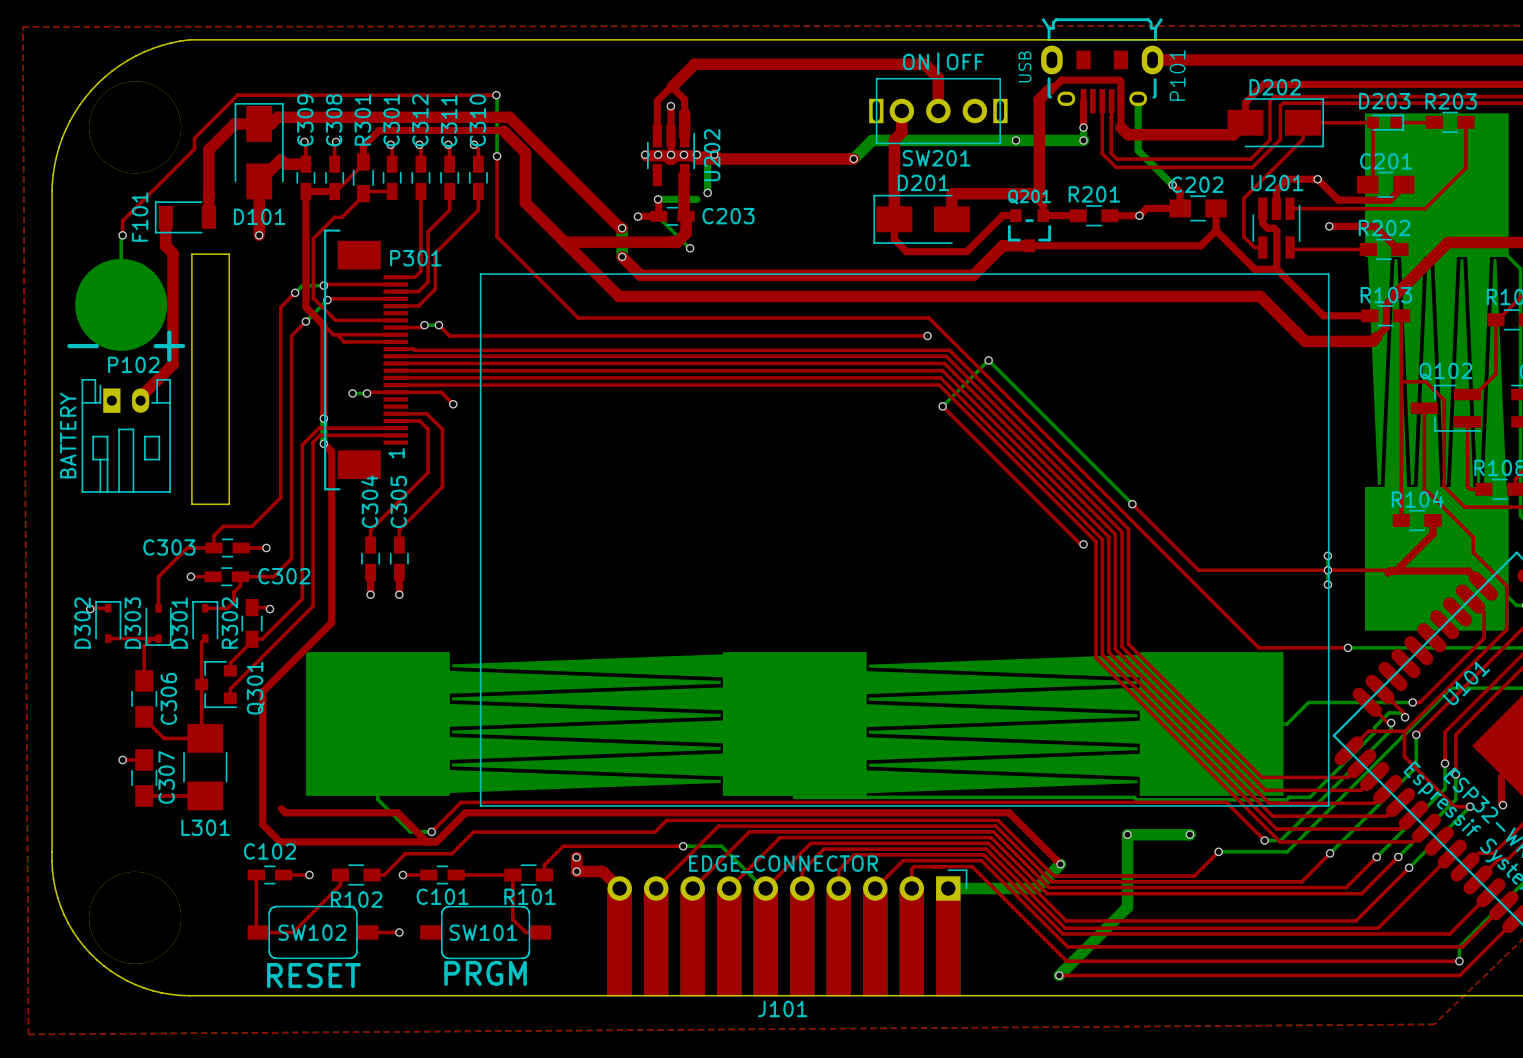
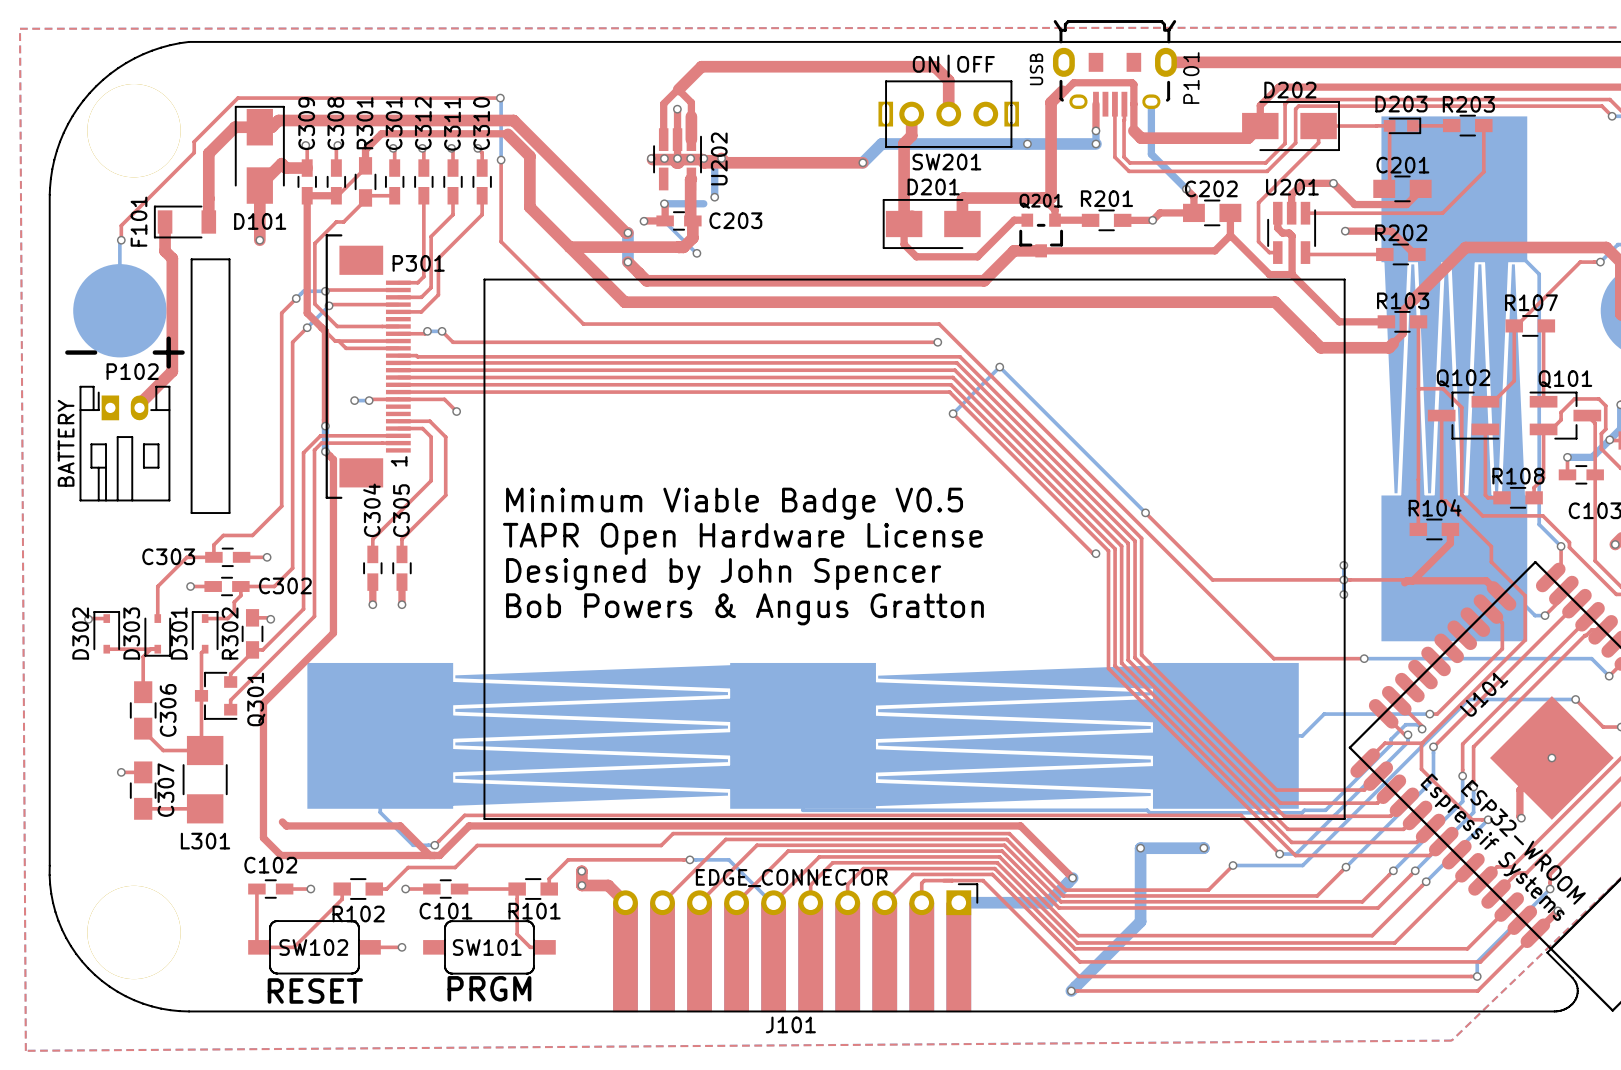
text: none -> Minimum Viable Badge V0.5 (734, 503)
text: none -> TAPR Open Hardware License (742, 538)
text: none -> Designed by John Spencer (723, 574)
text: none -> Bob Powers & Angus Gratton (744, 609)

